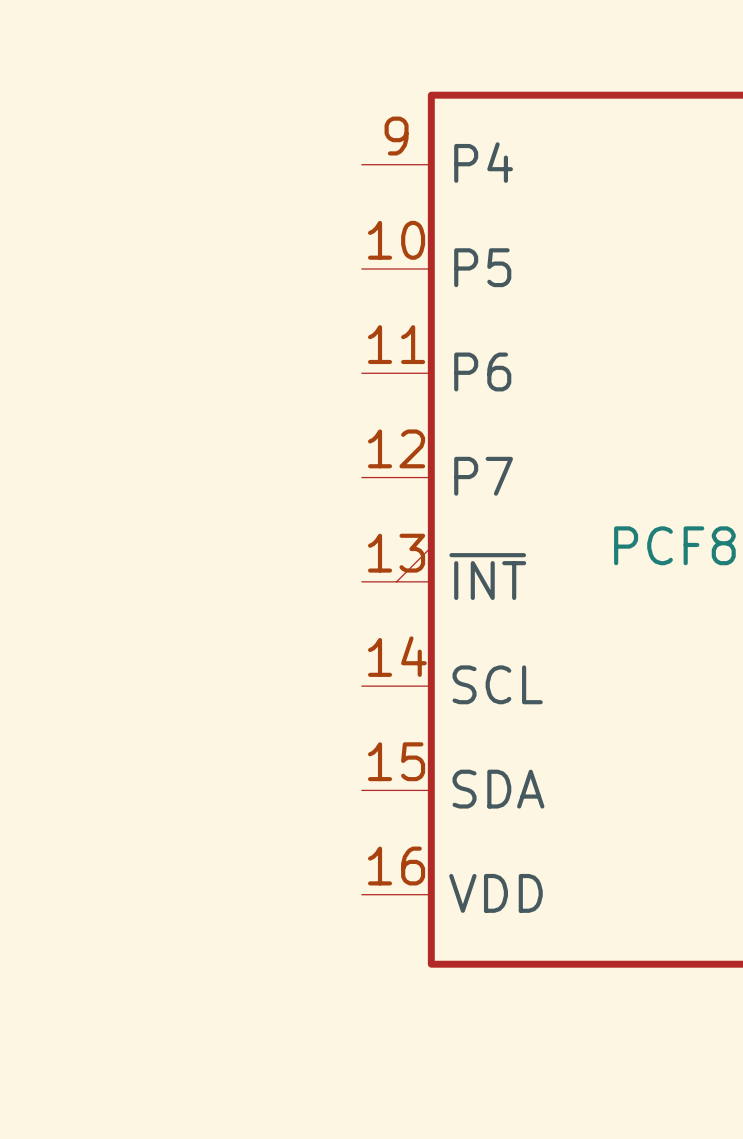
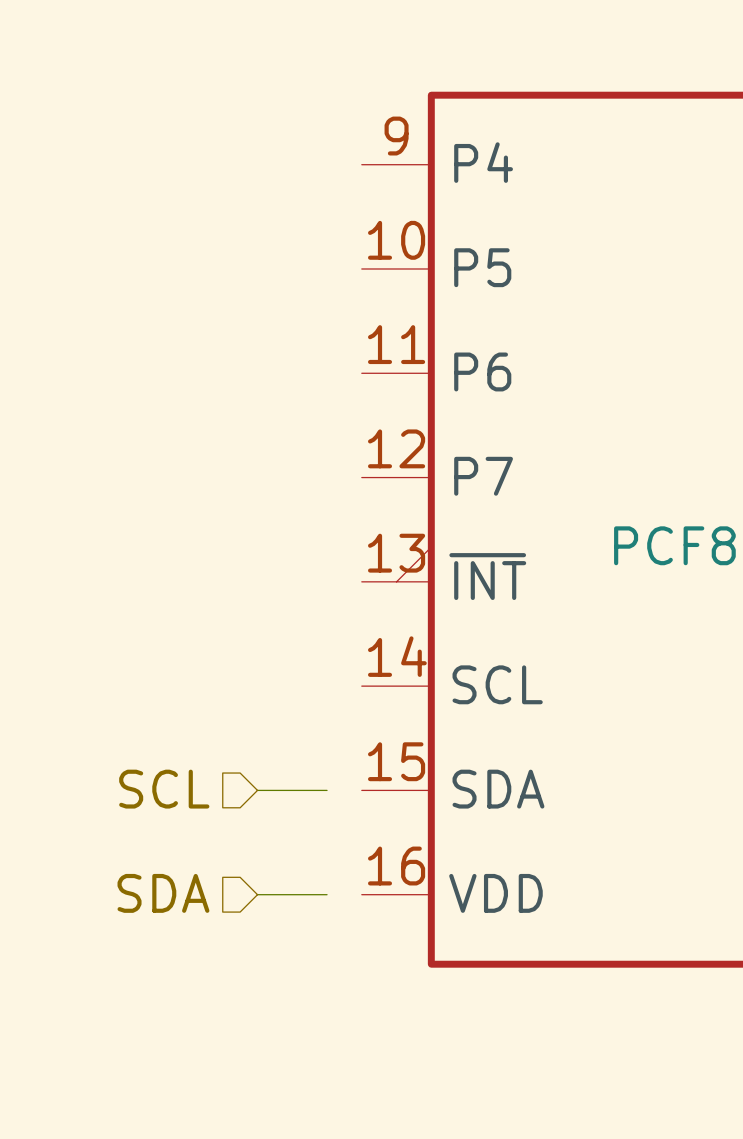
hierarchical label: none -> SCL (164, 789)
wire: none -> (257, 790) (327, 790)
hierarchical label: none -> SDA (163, 893)
wire: none -> (257, 894) (327, 894)

